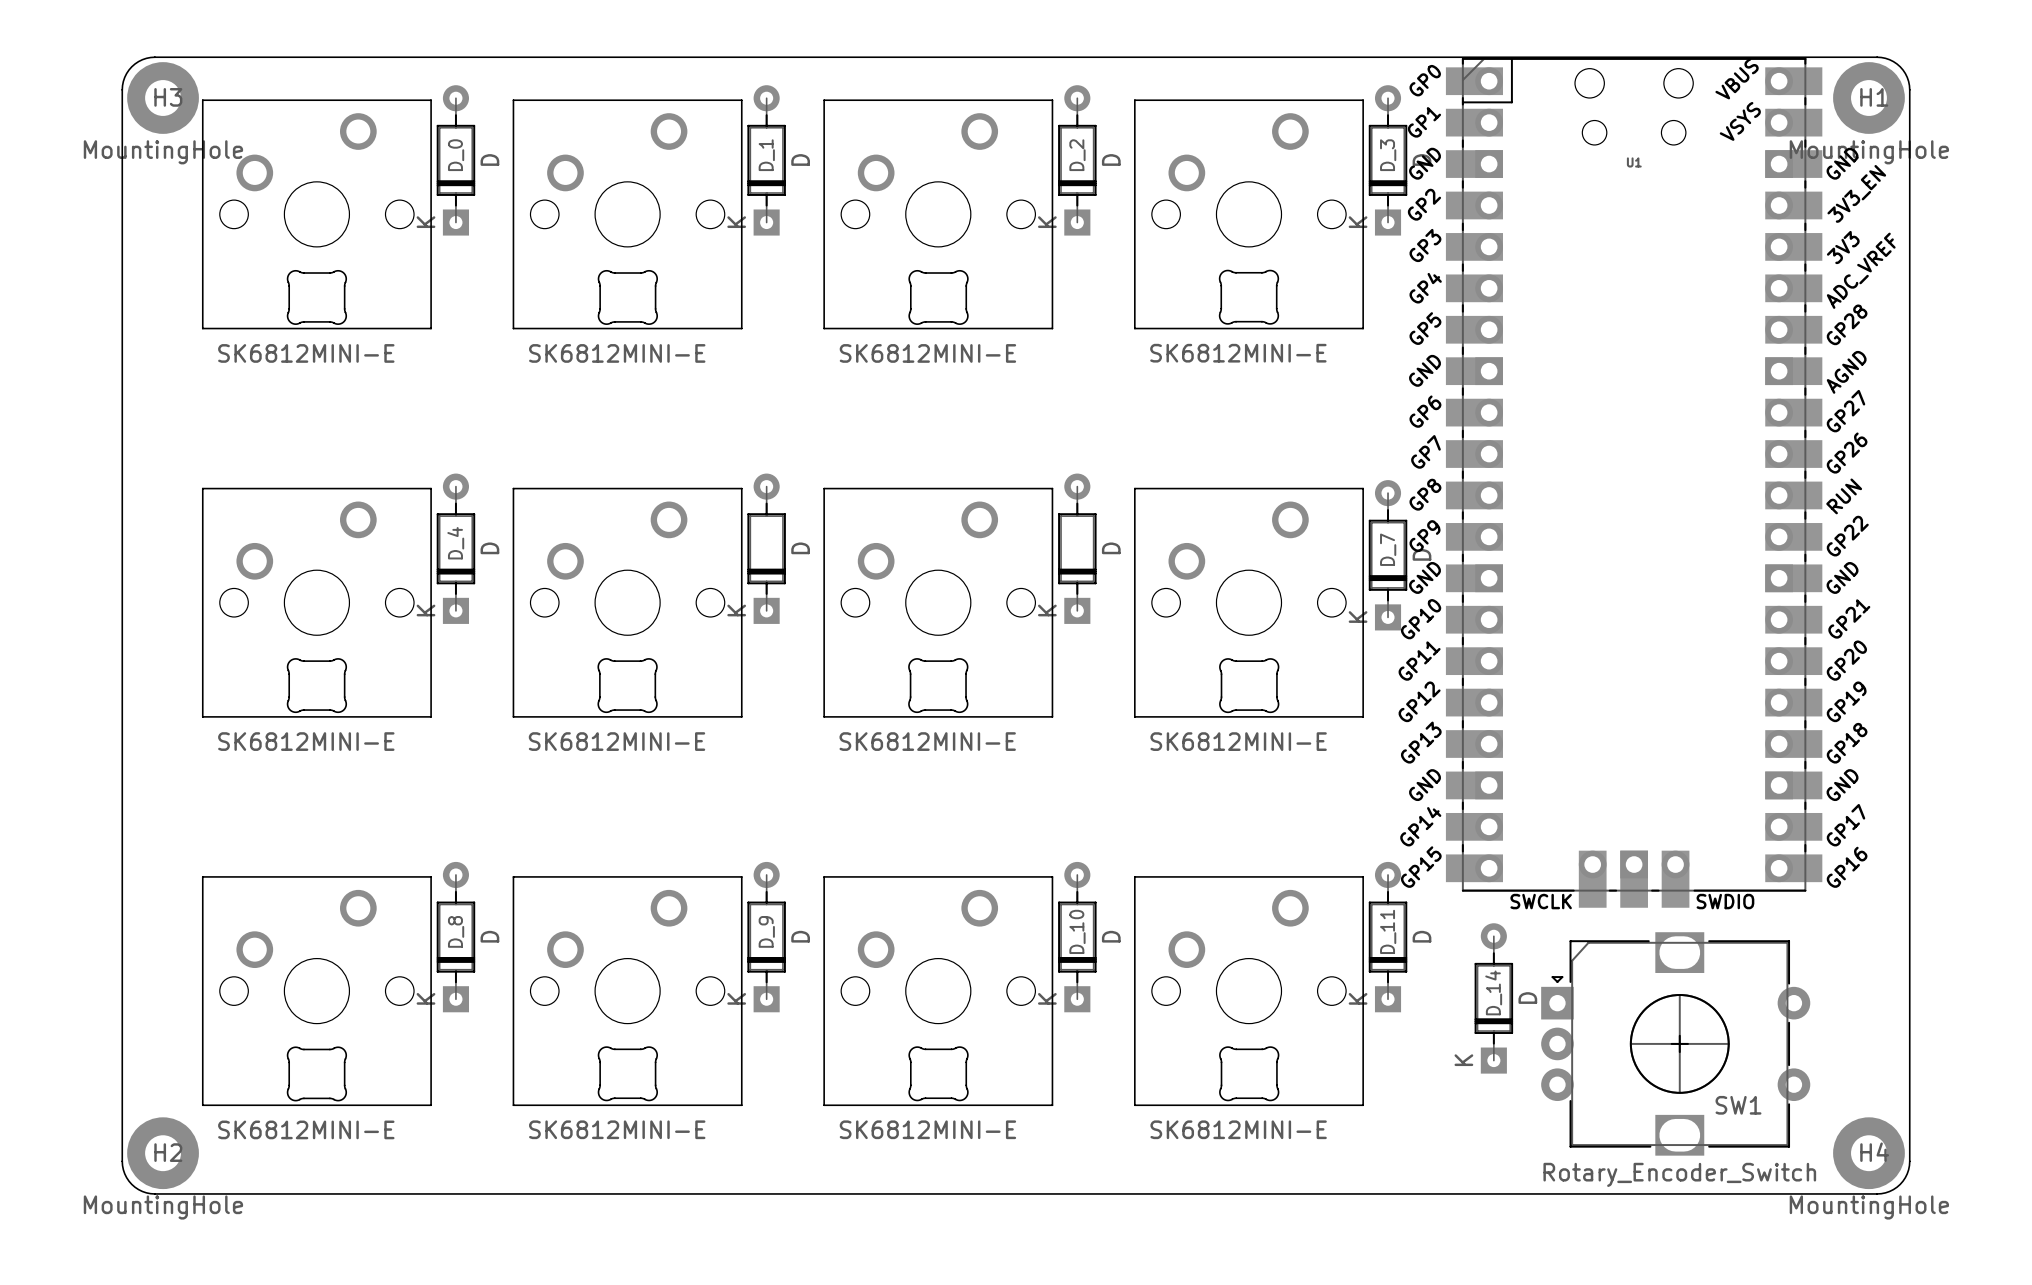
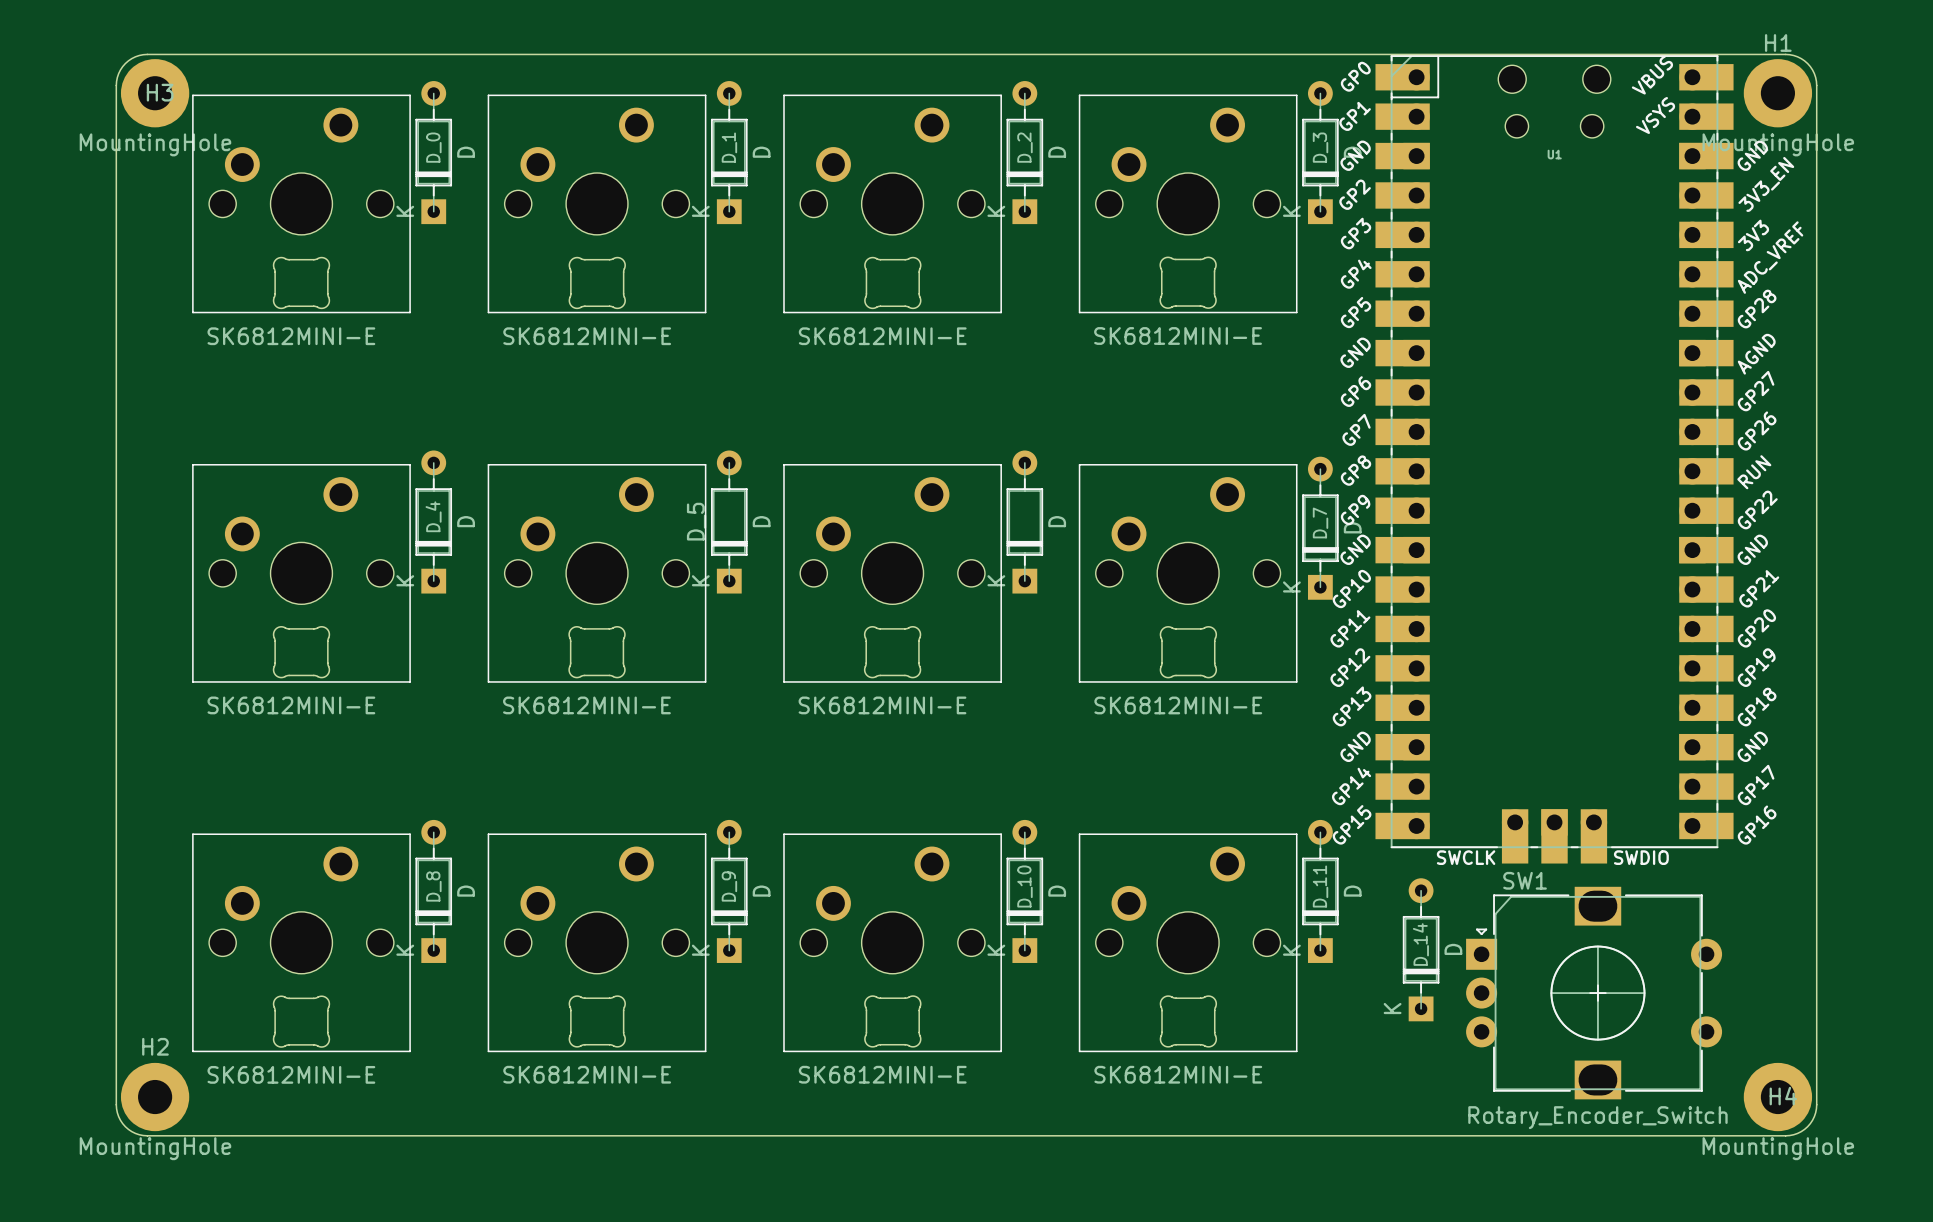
H1 name position: H1 (1874, 97) -> H1 (1778, 43)
D_5 name: none -> D_5 (696, 521)
SW1 name position: SW1 (1738, 1105) -> SW1 (1525, 880)
H2 name position: H2 (168, 1152) -> H2 (155, 1046)

